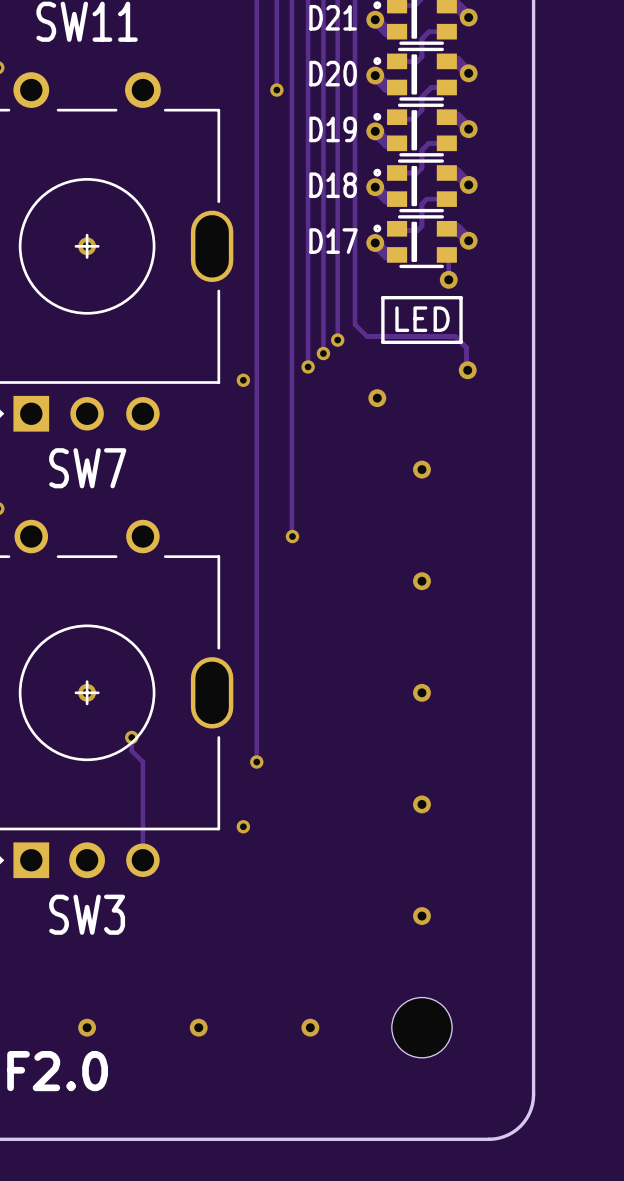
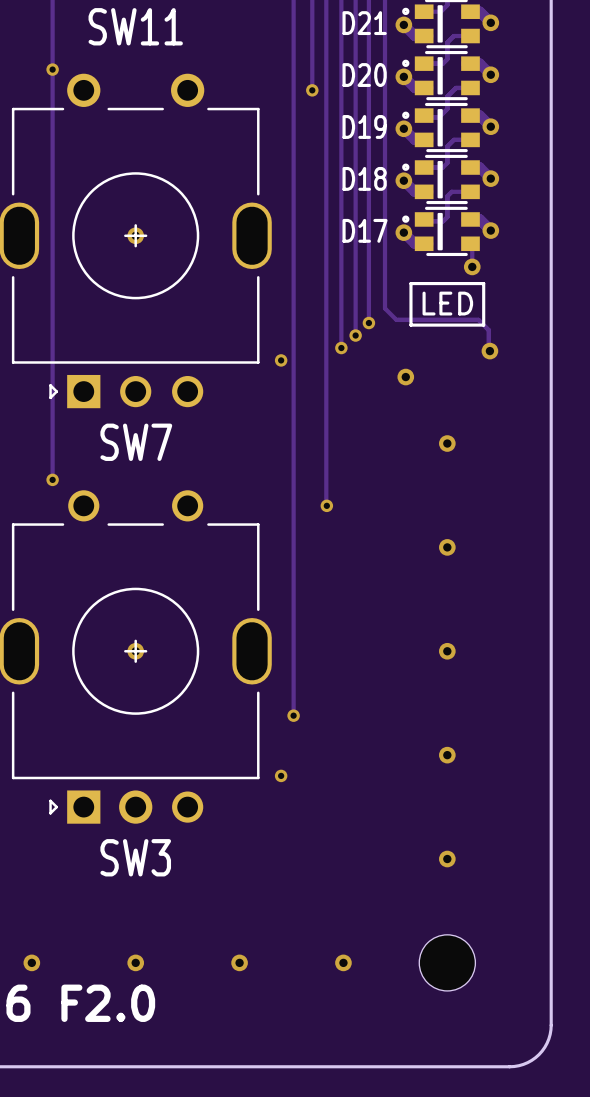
track: (131, 737) (131, 750) (142, 762) (142, 860) -> none
via: (131, 737) -> none

